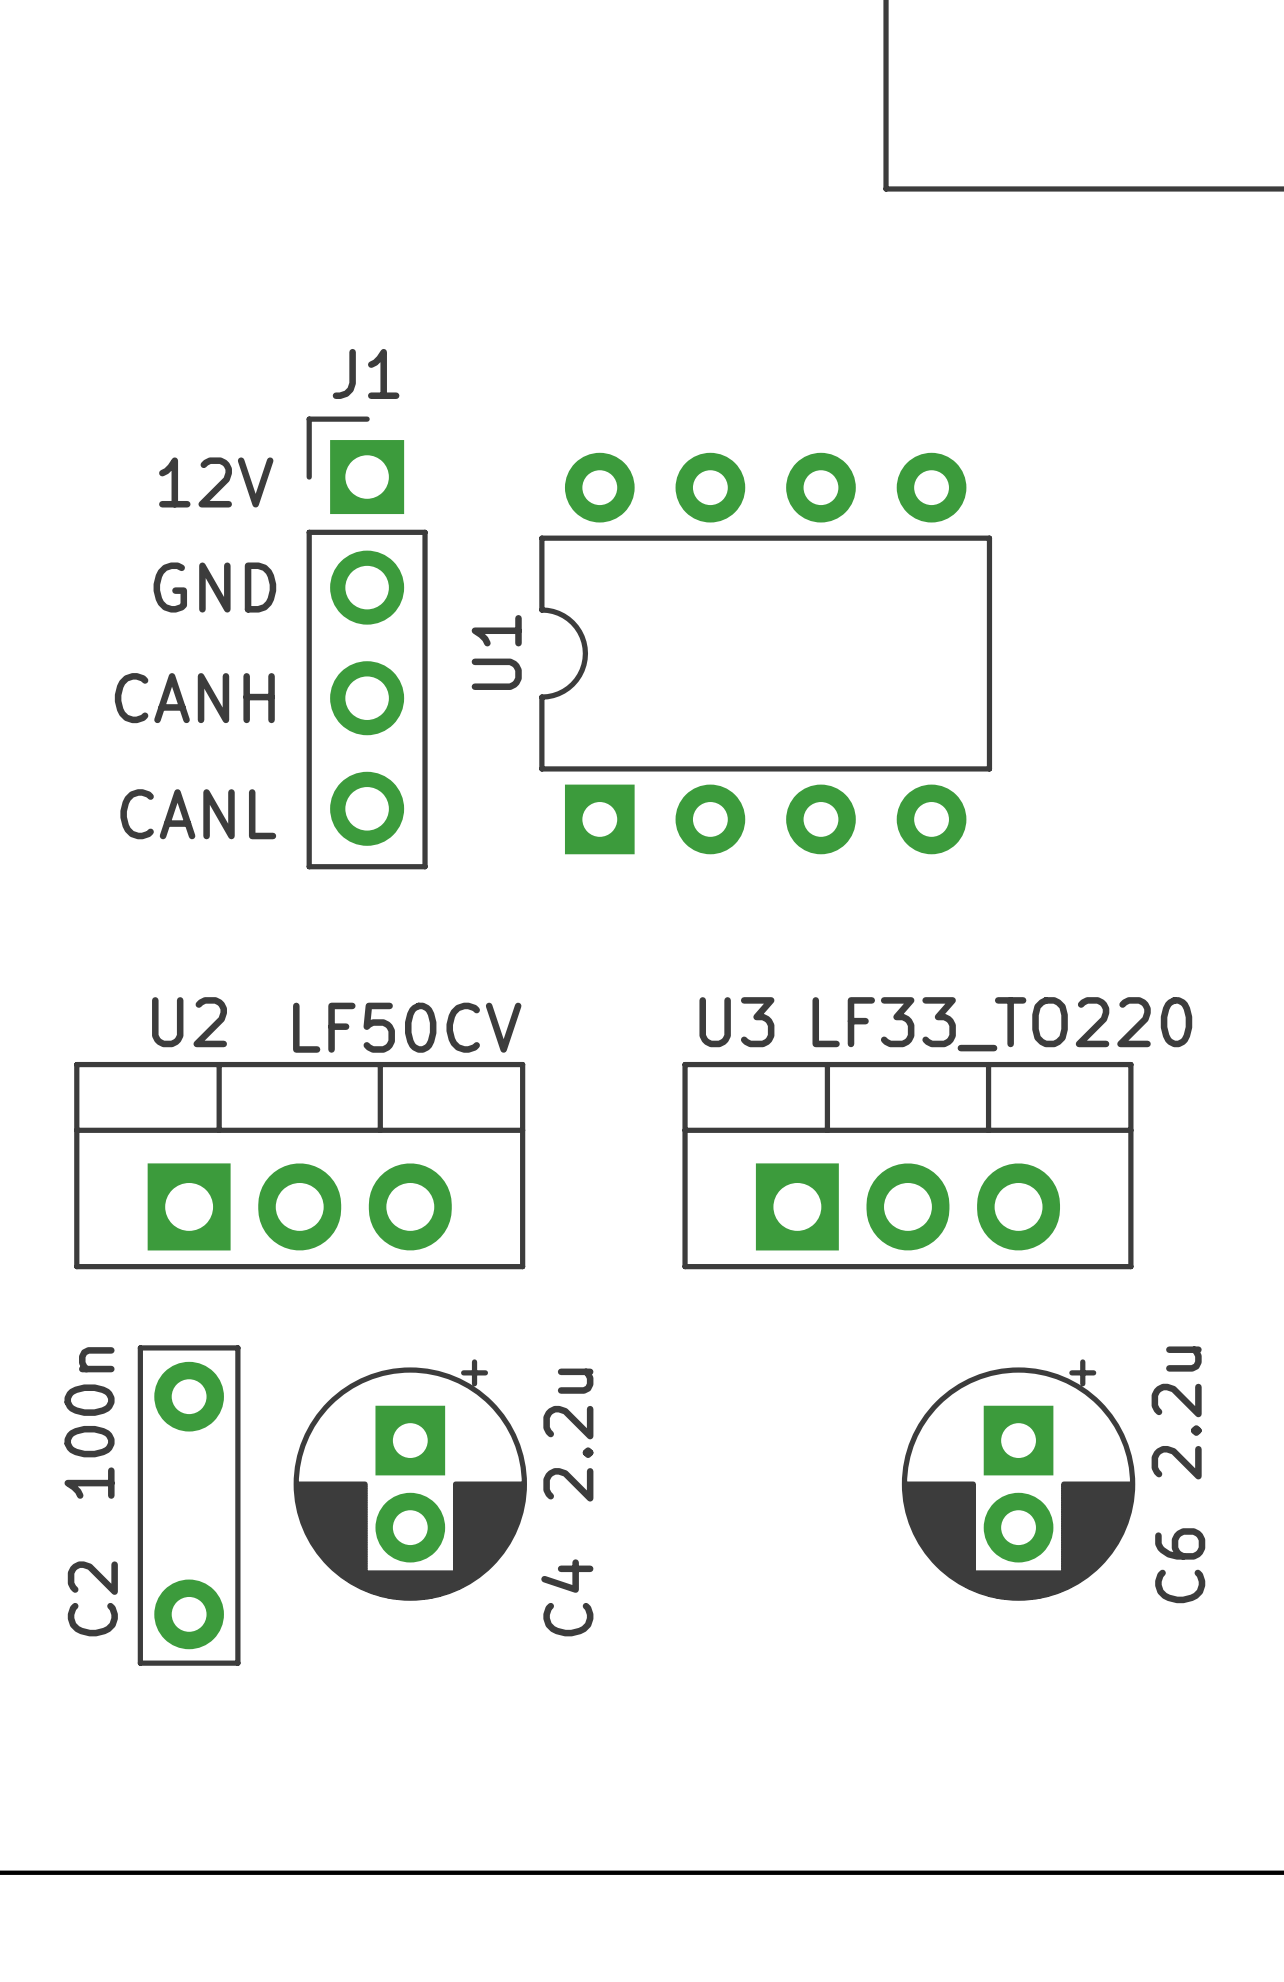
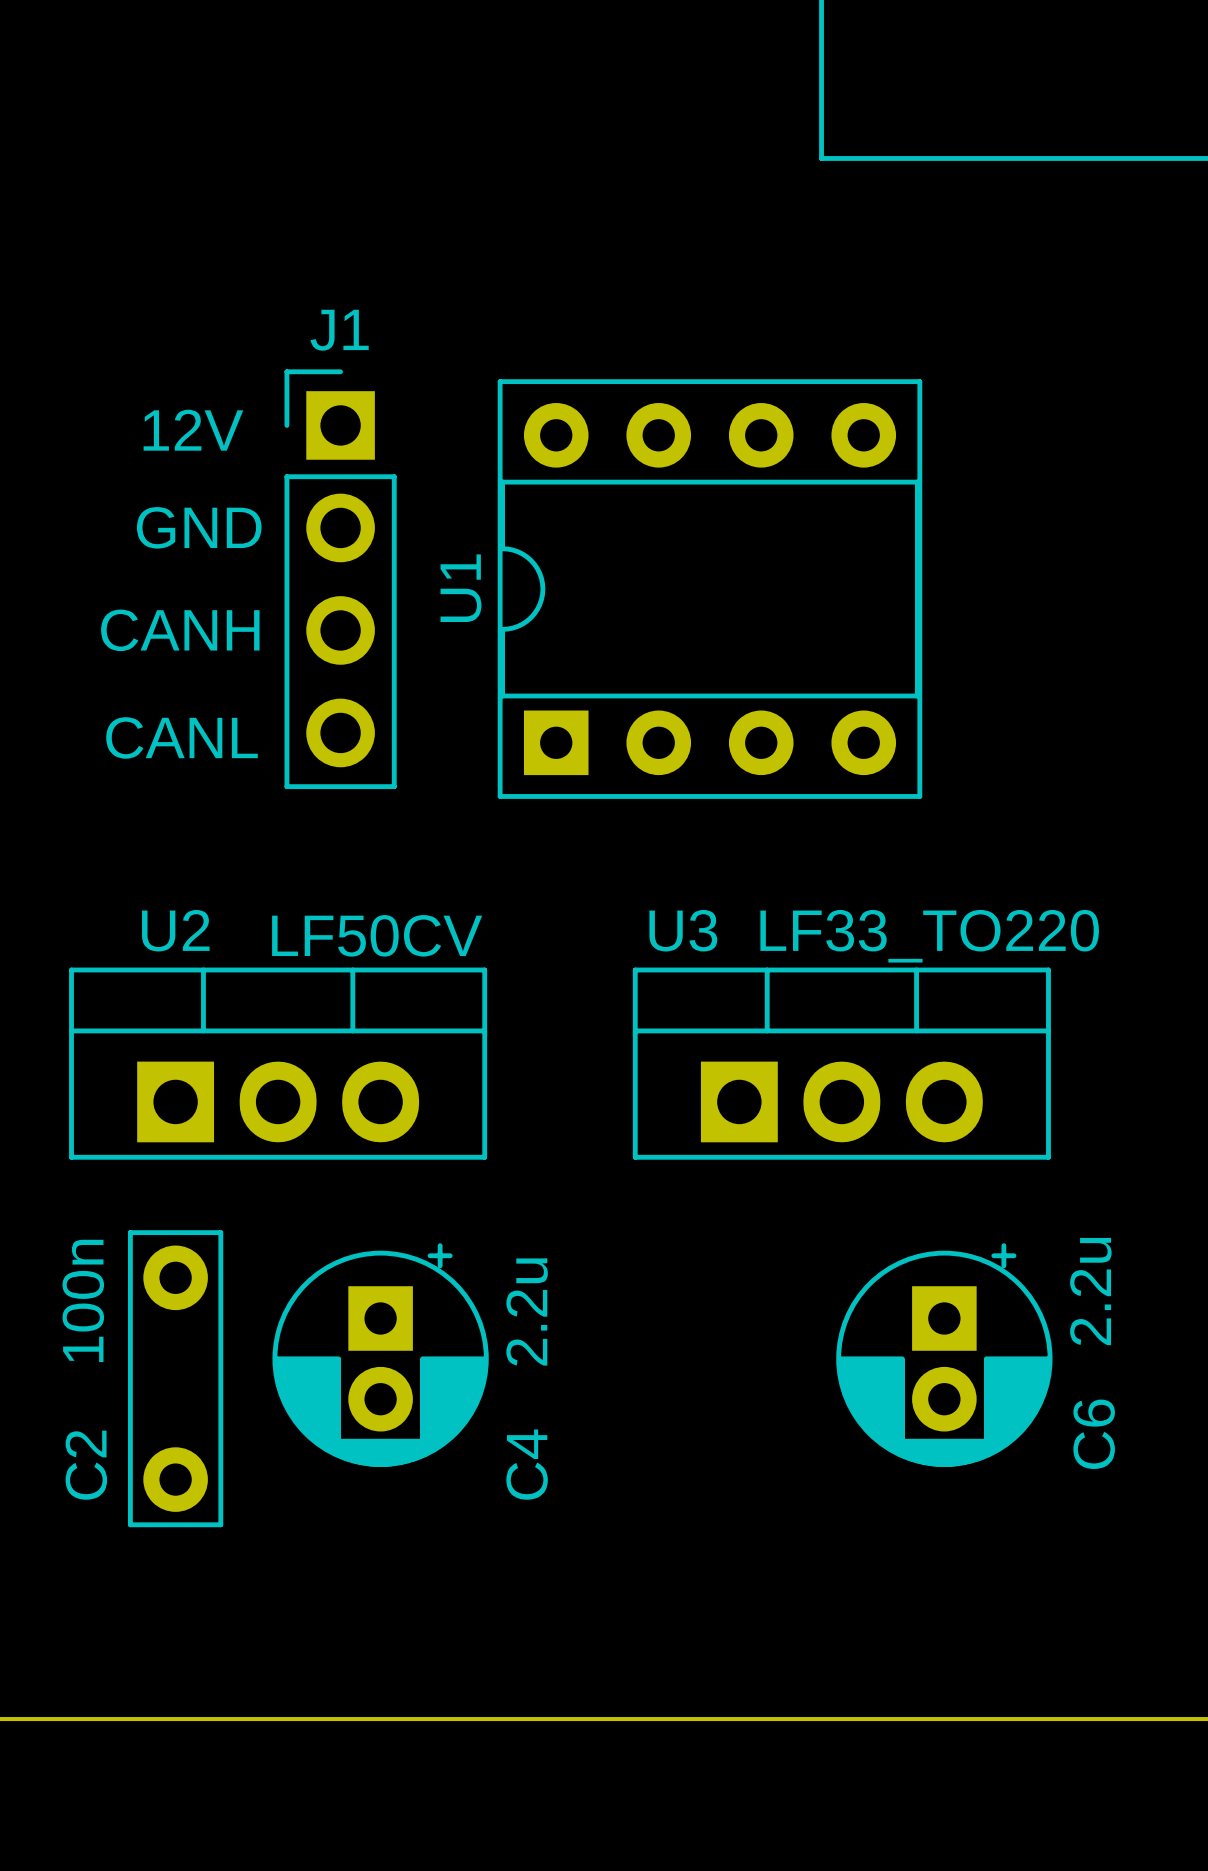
U1 footprint: [539, 452, 993, 855] -> [497, 379, 923, 799]

